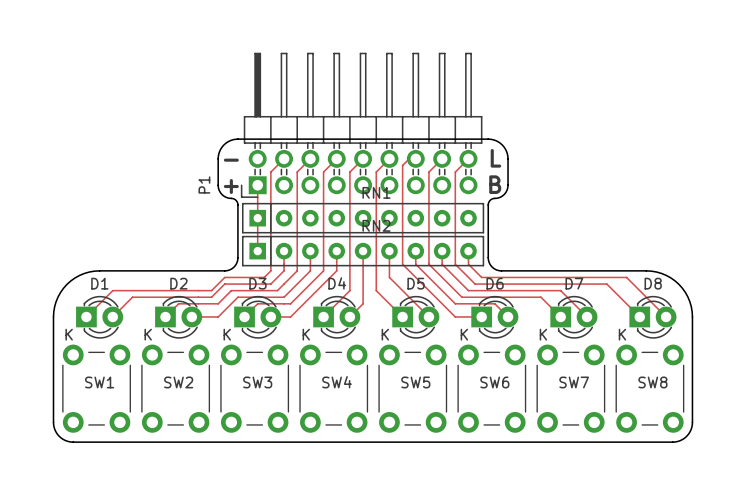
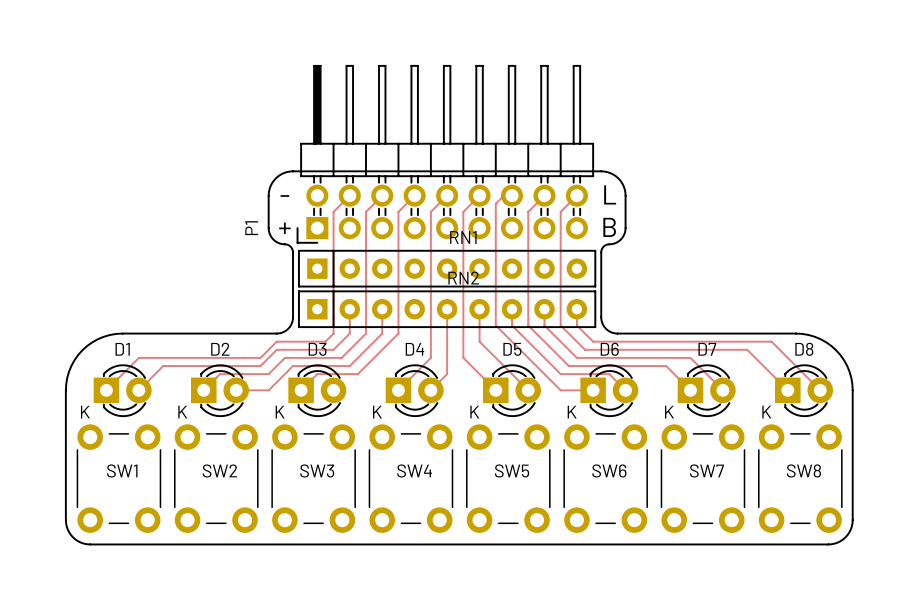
track: (257, 185) (257, 251) -> none
track: (336, 251) (336, 270) (290, 316) (270, 316) -> none

